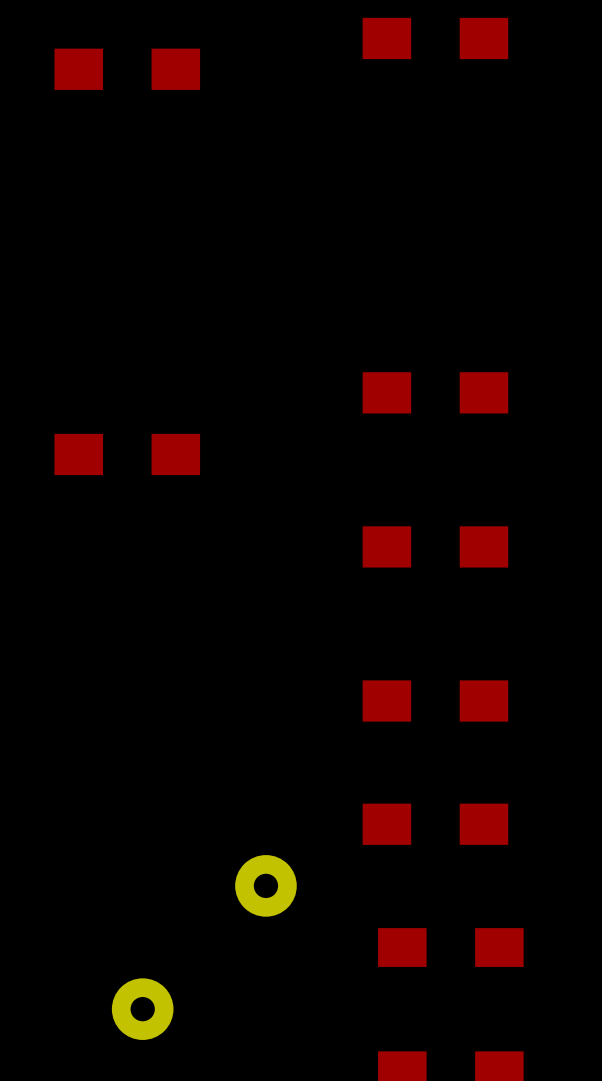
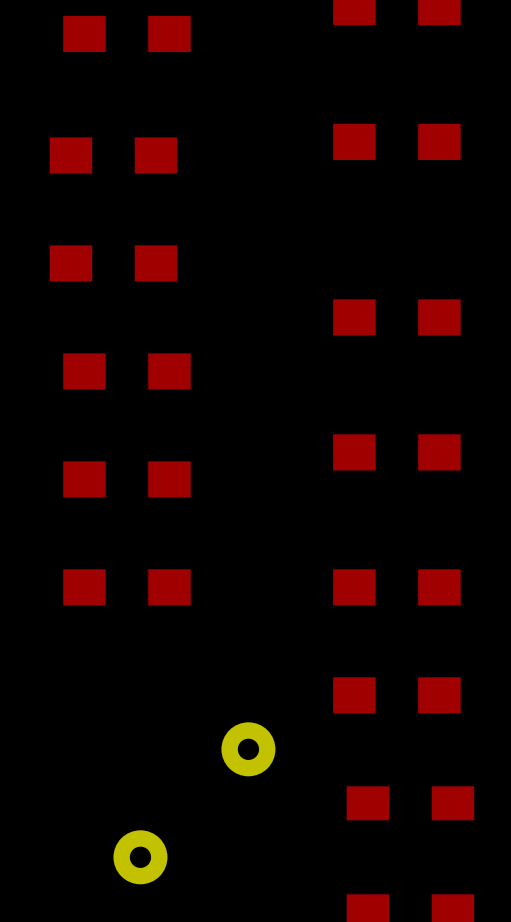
part: none -> (396, 141)
part: none -> (113, 155)
part: none -> (113, 263)
part: none -> (126, 479)
part: none -> (126, 587)

